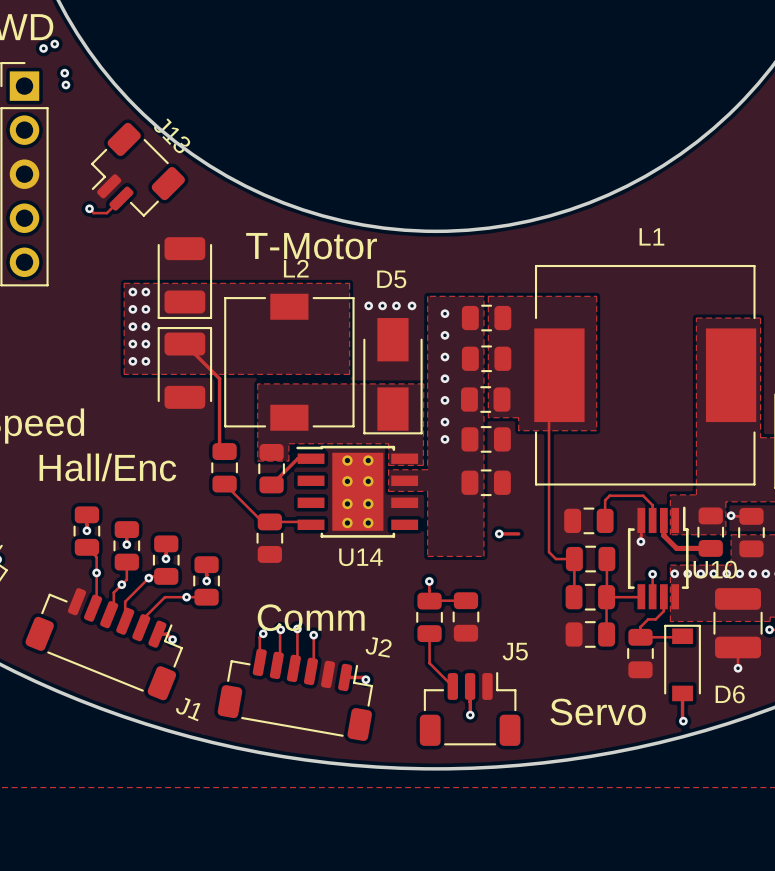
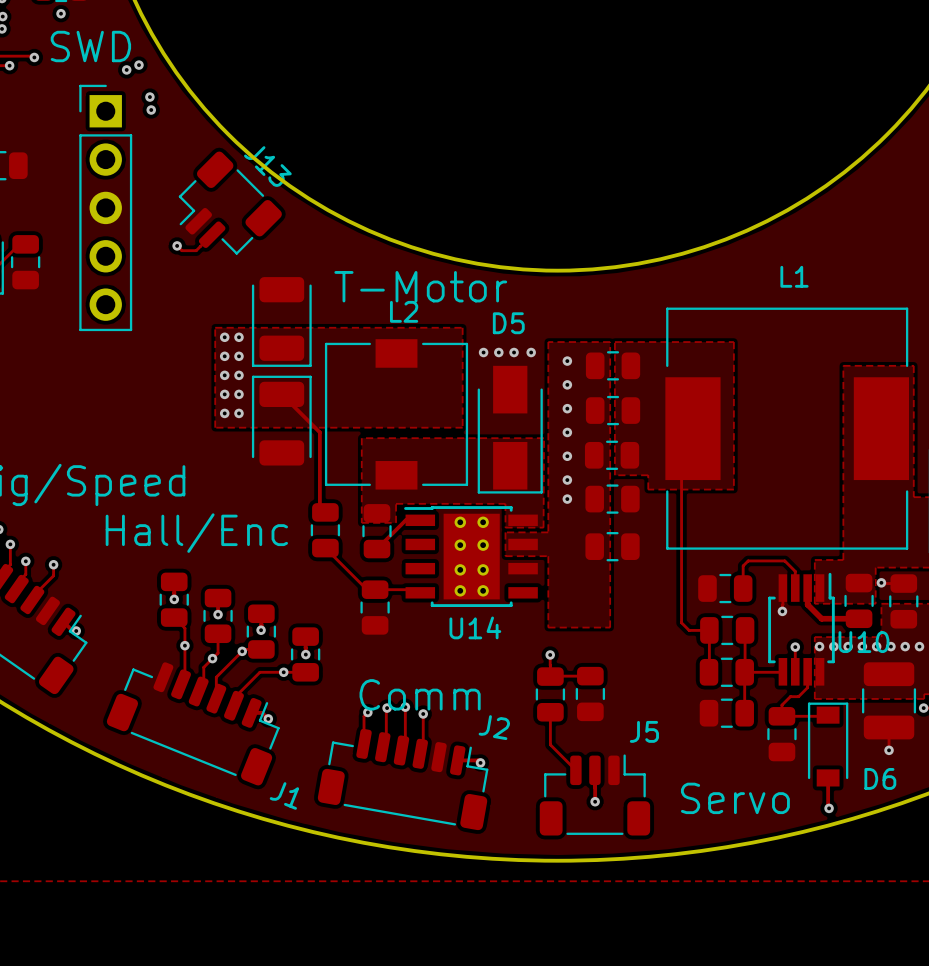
track: (499, 533) (518, 533) -> none
via: (499, 533) -> none

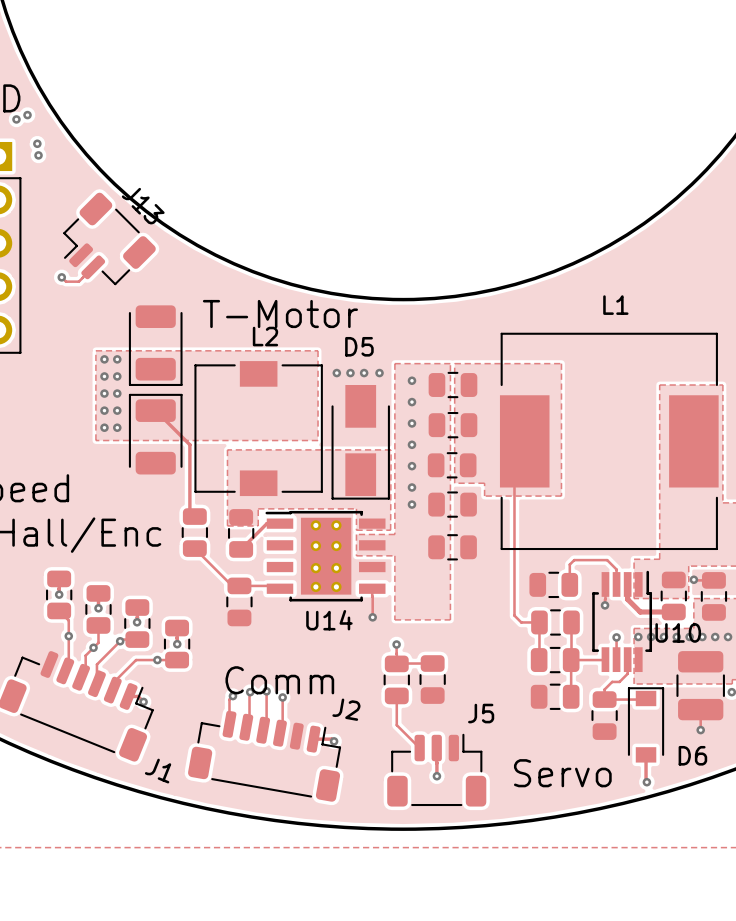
track: none -> (372, 588) (372, 617)
via: none -> (372, 617)

